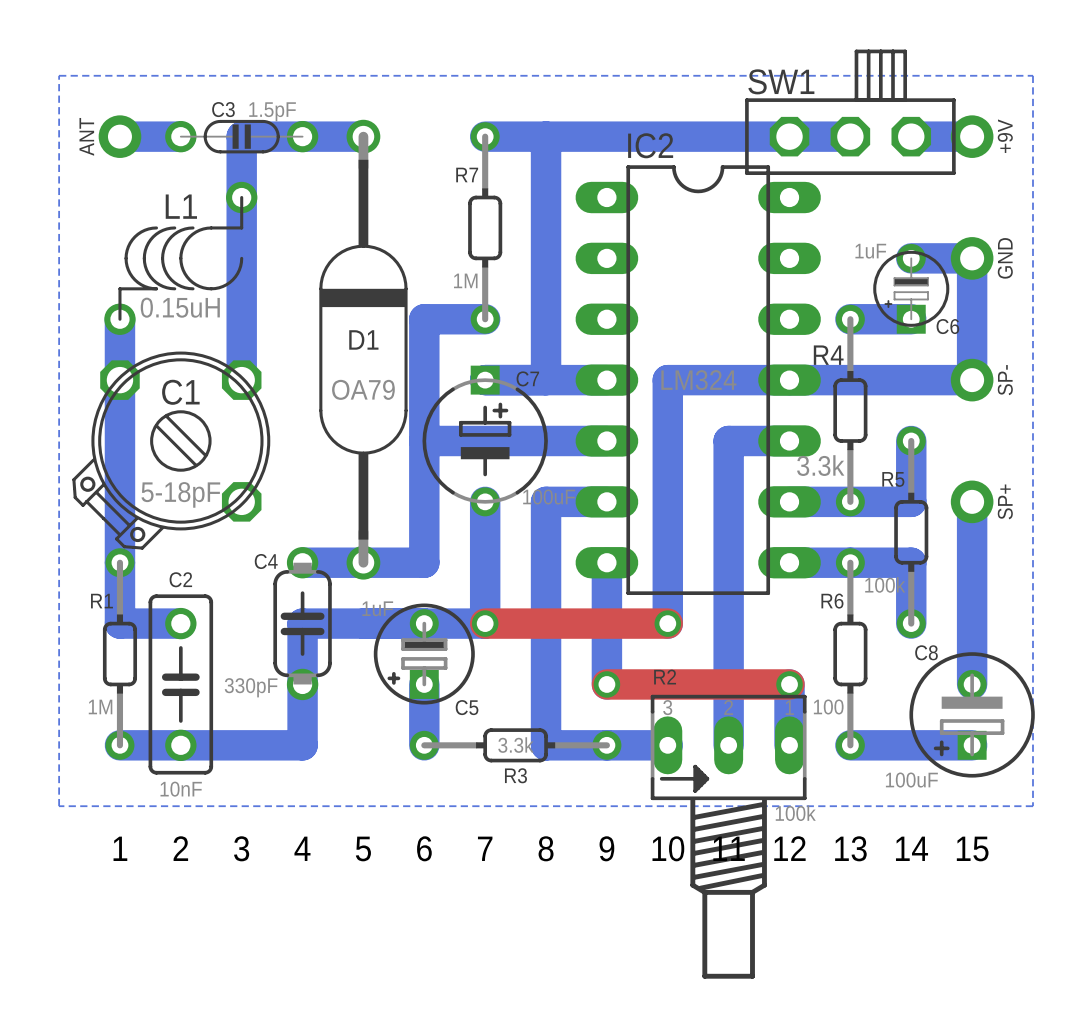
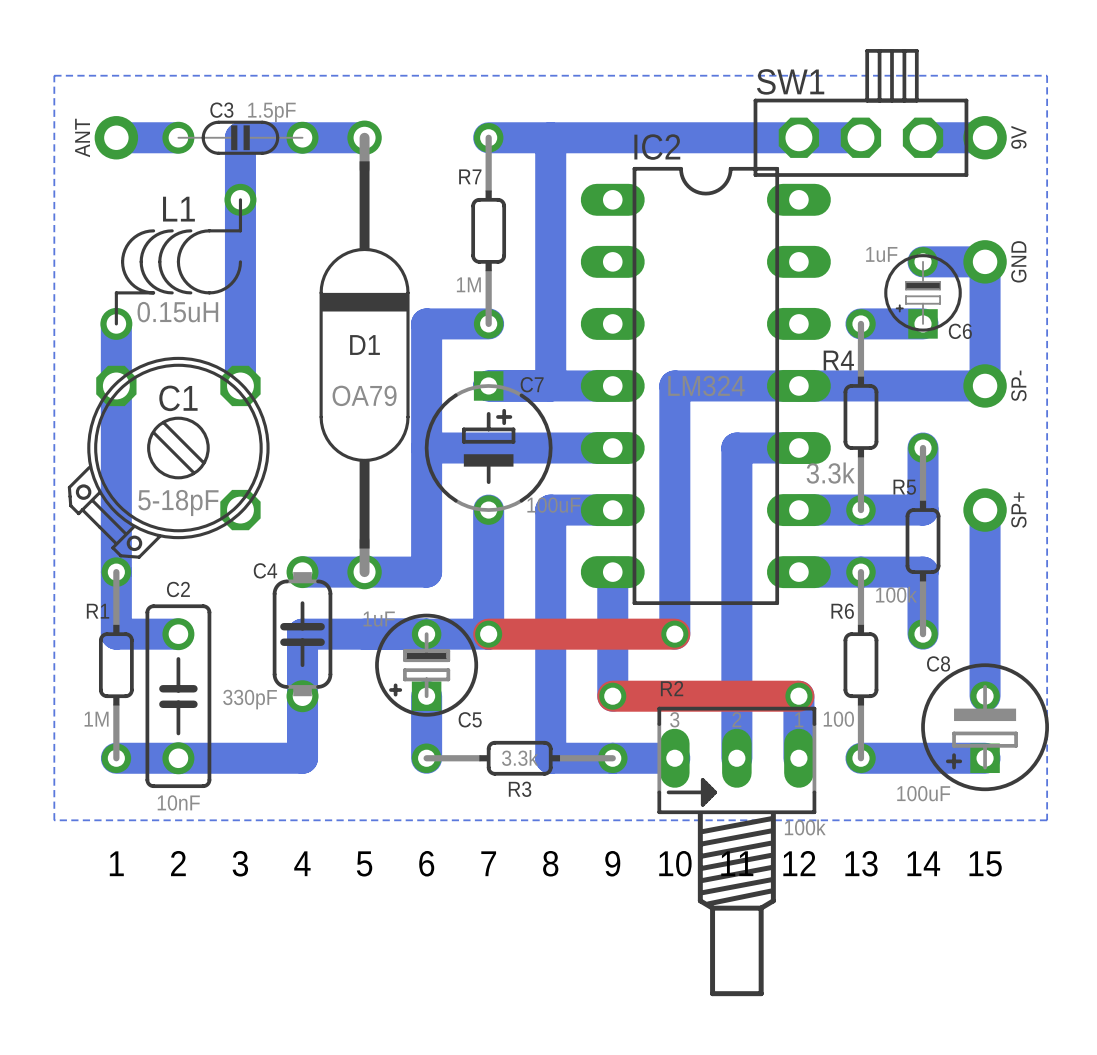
+9V name: +9V (1005, 136) -> 9V (1018, 137)

